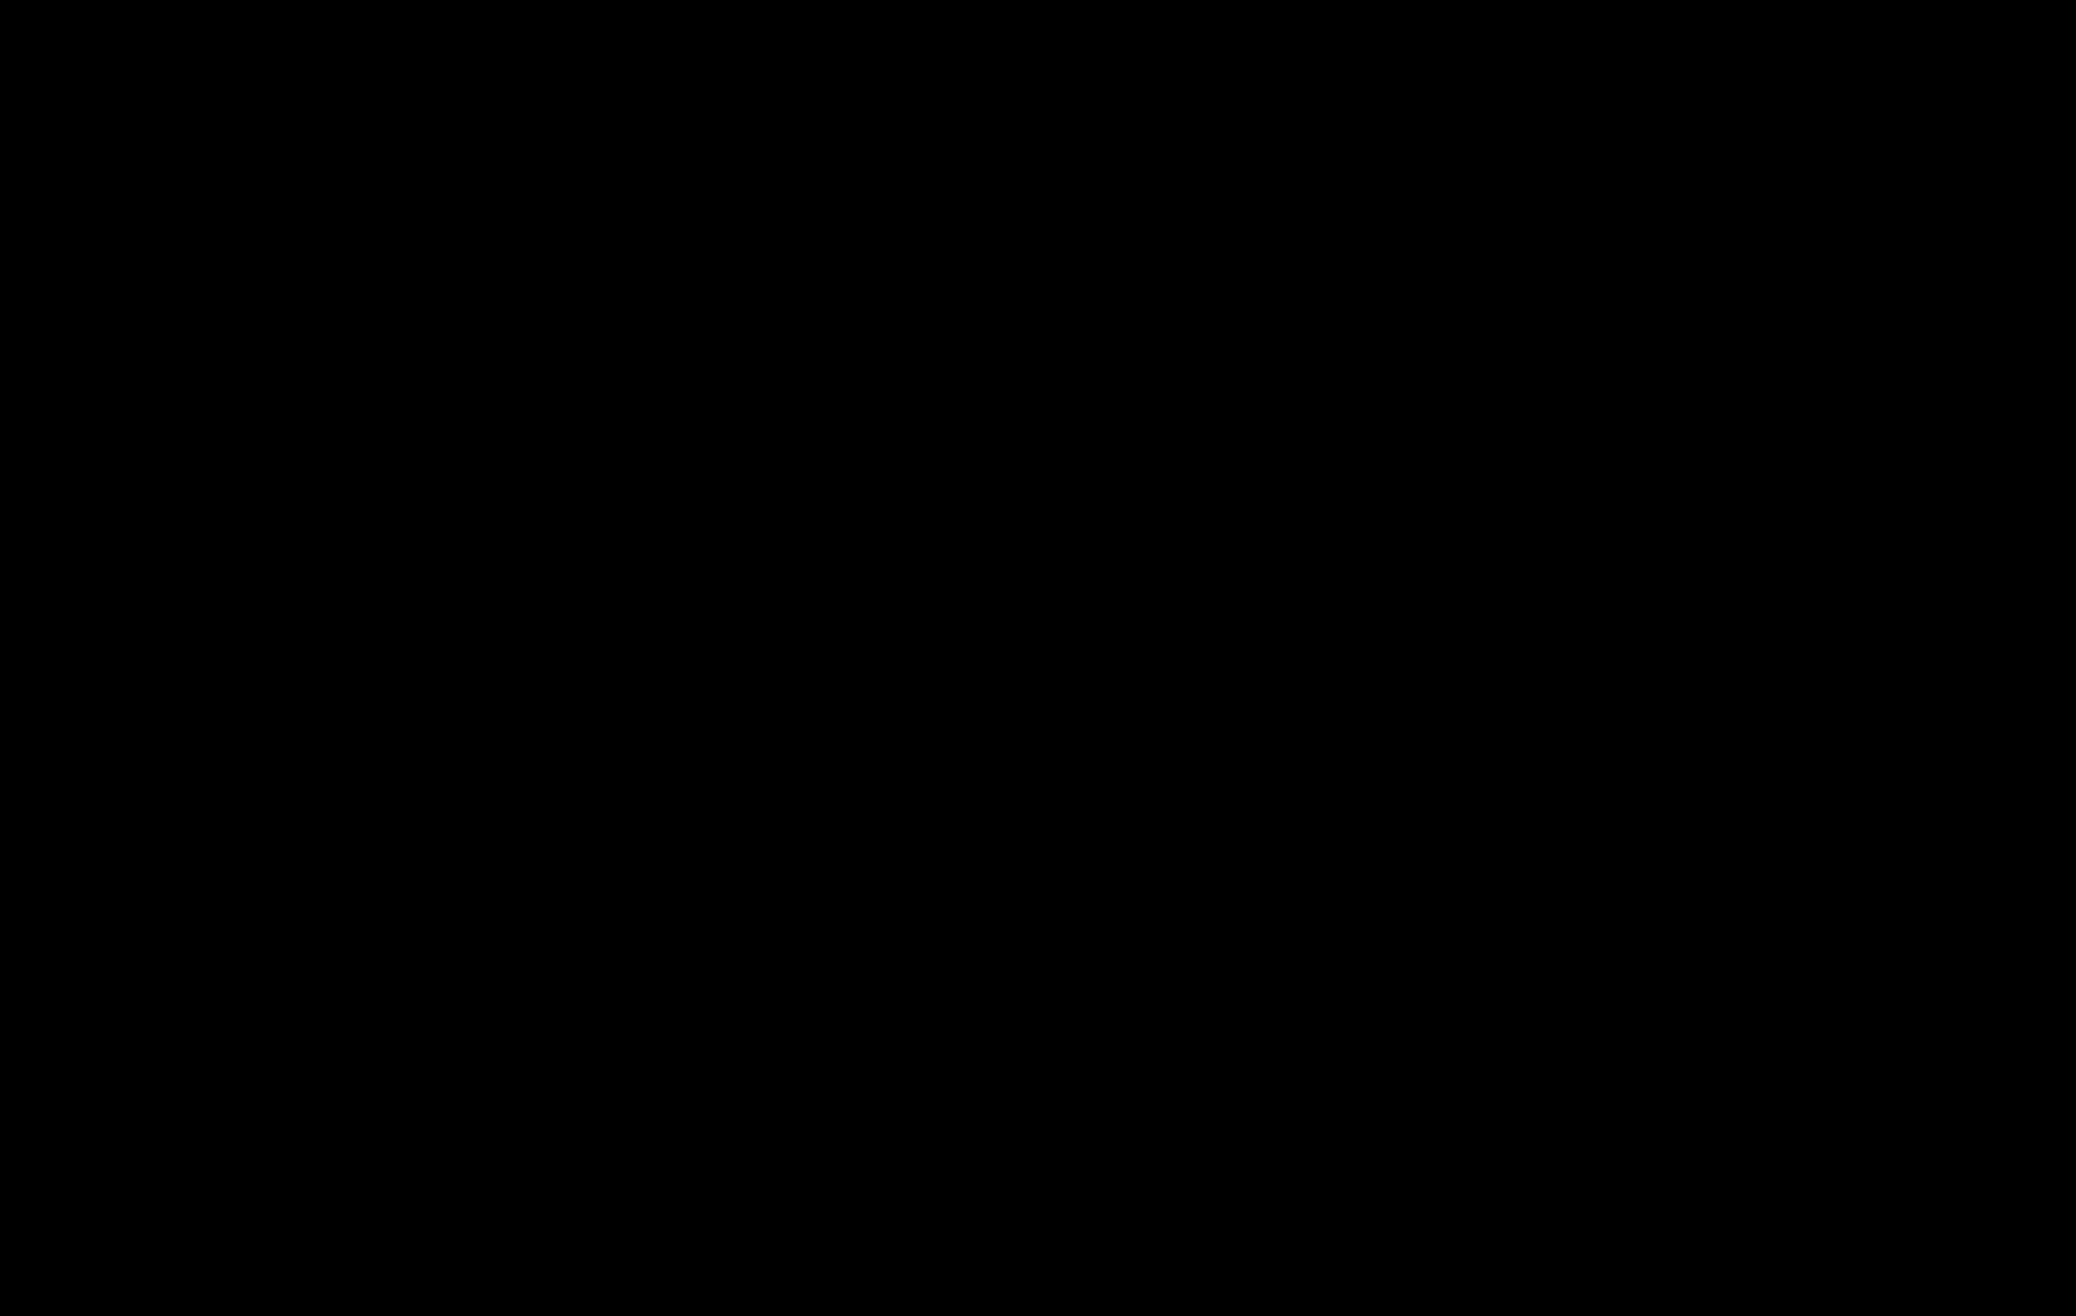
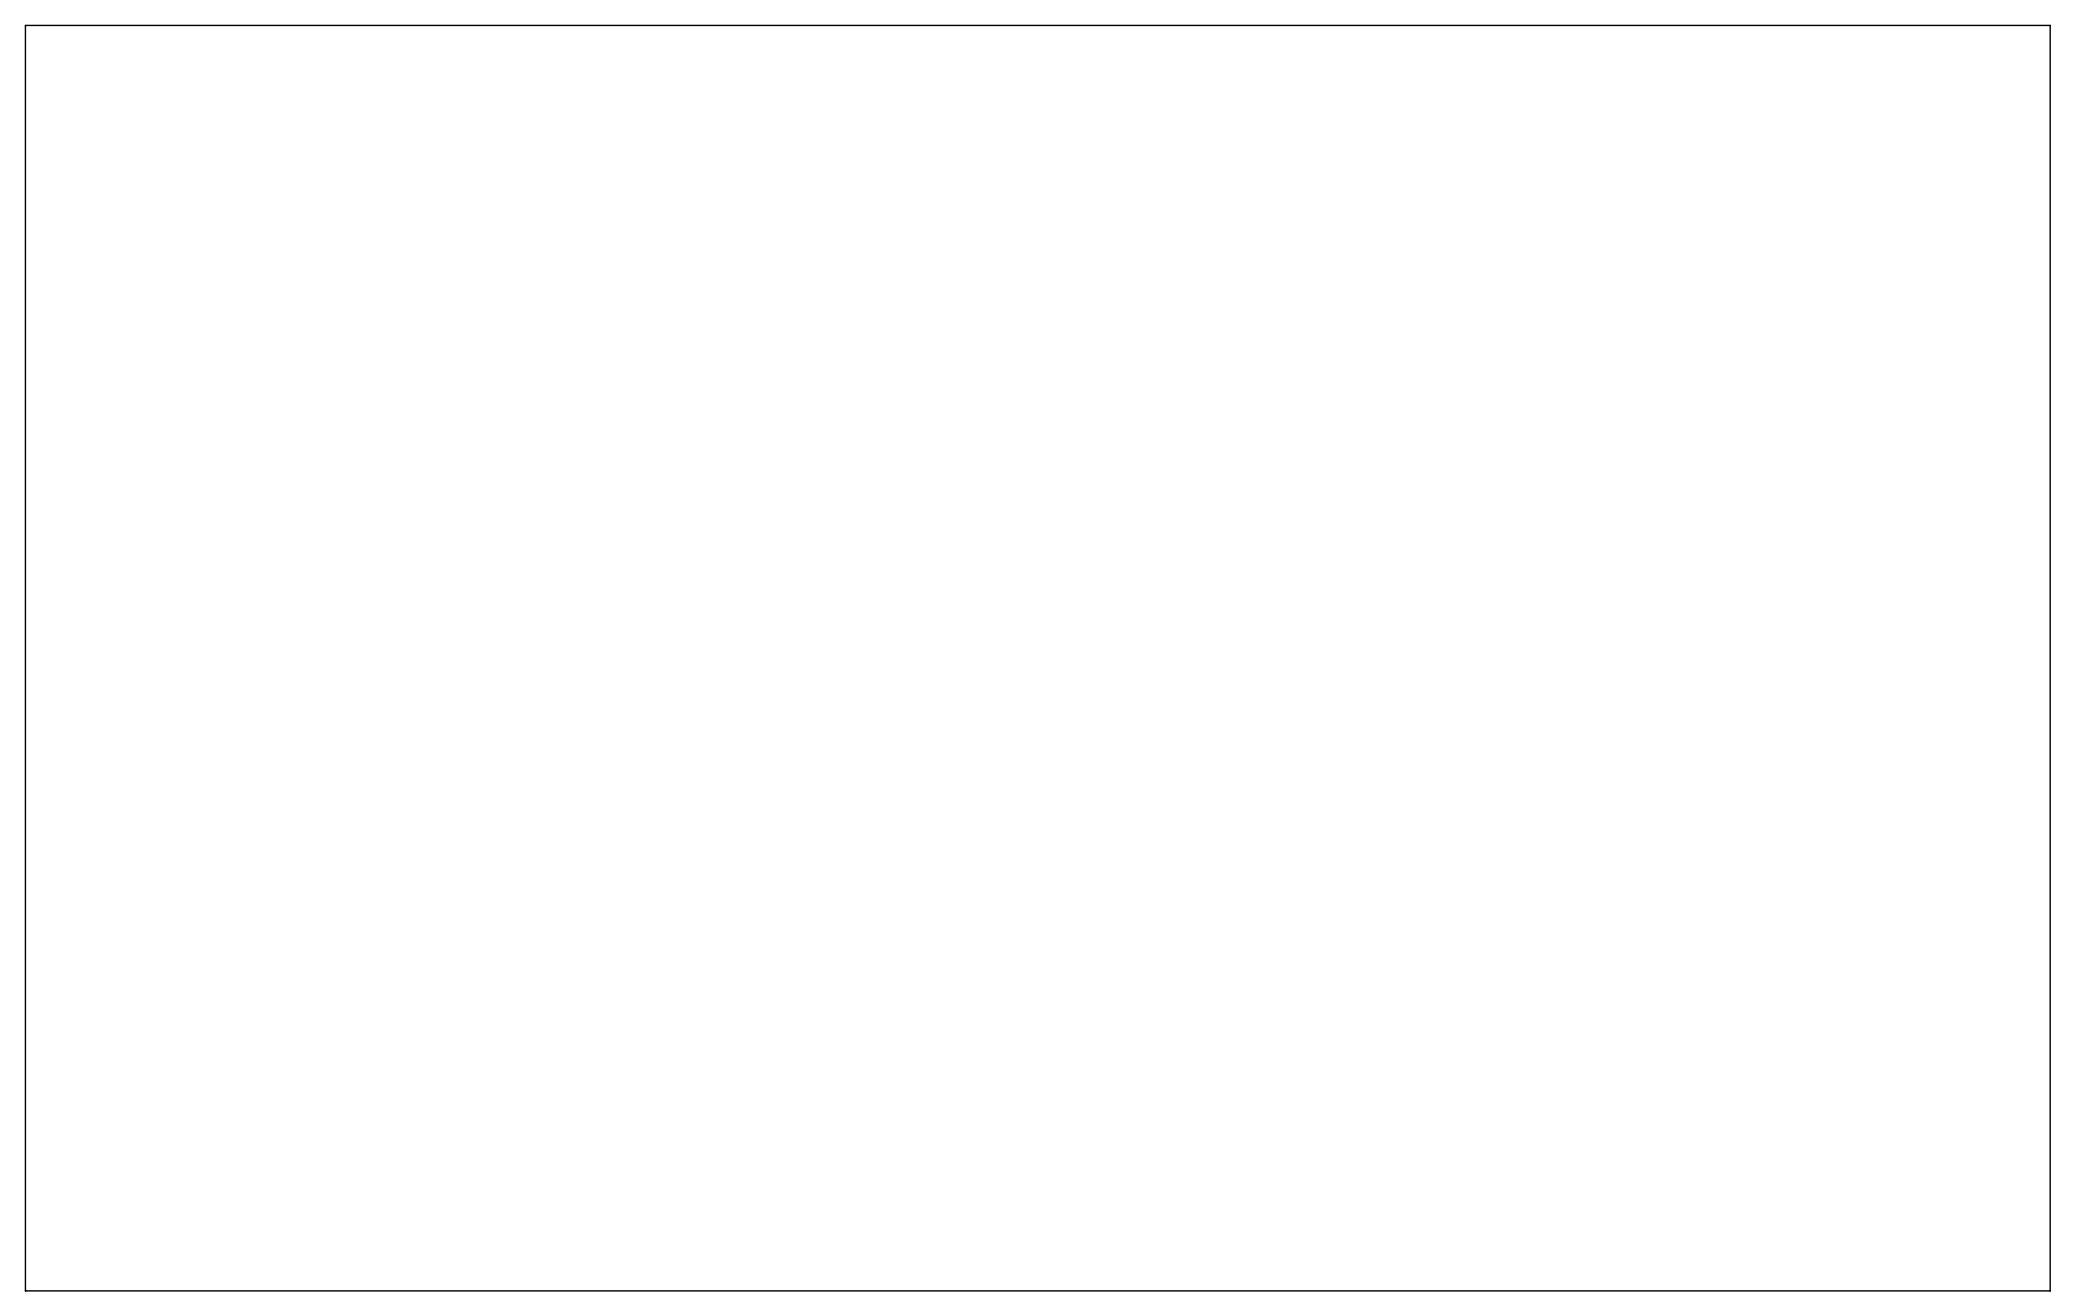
board edge: none -> (25, 25) (2050, 25) (2050, 1290) (25, 1290) (25, 25)

